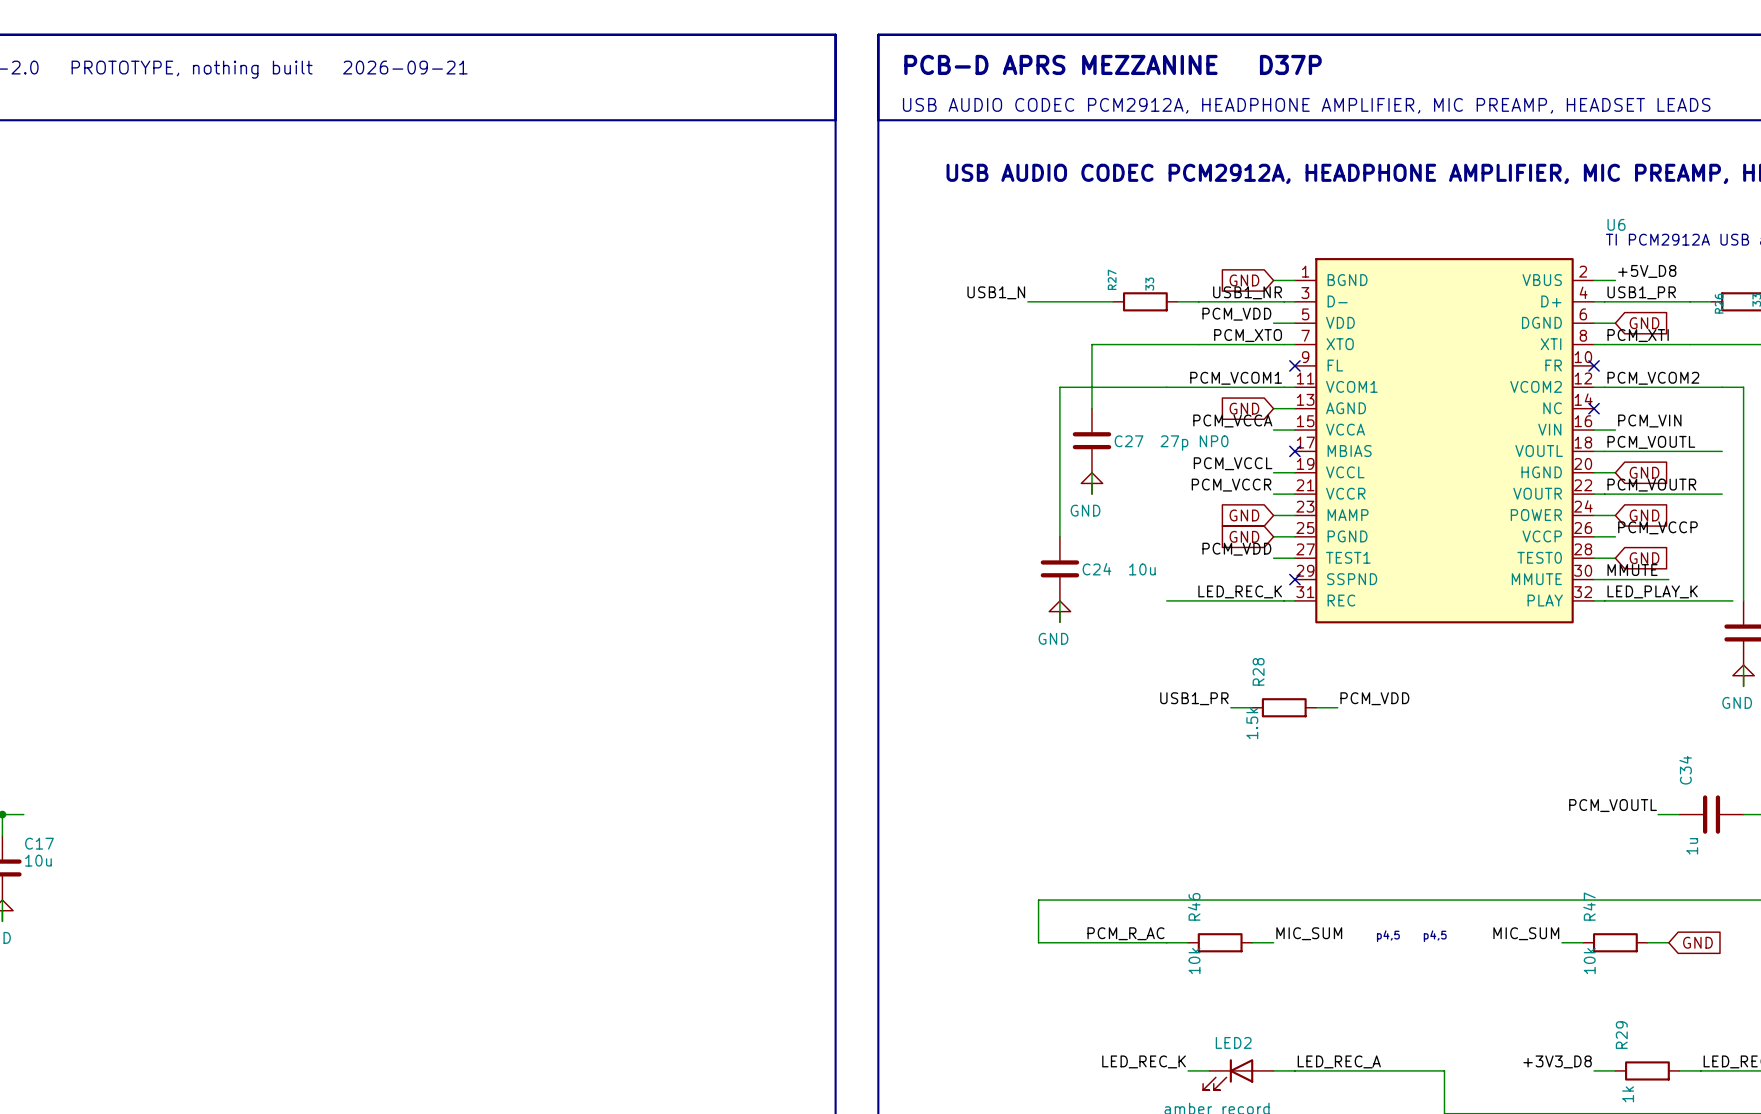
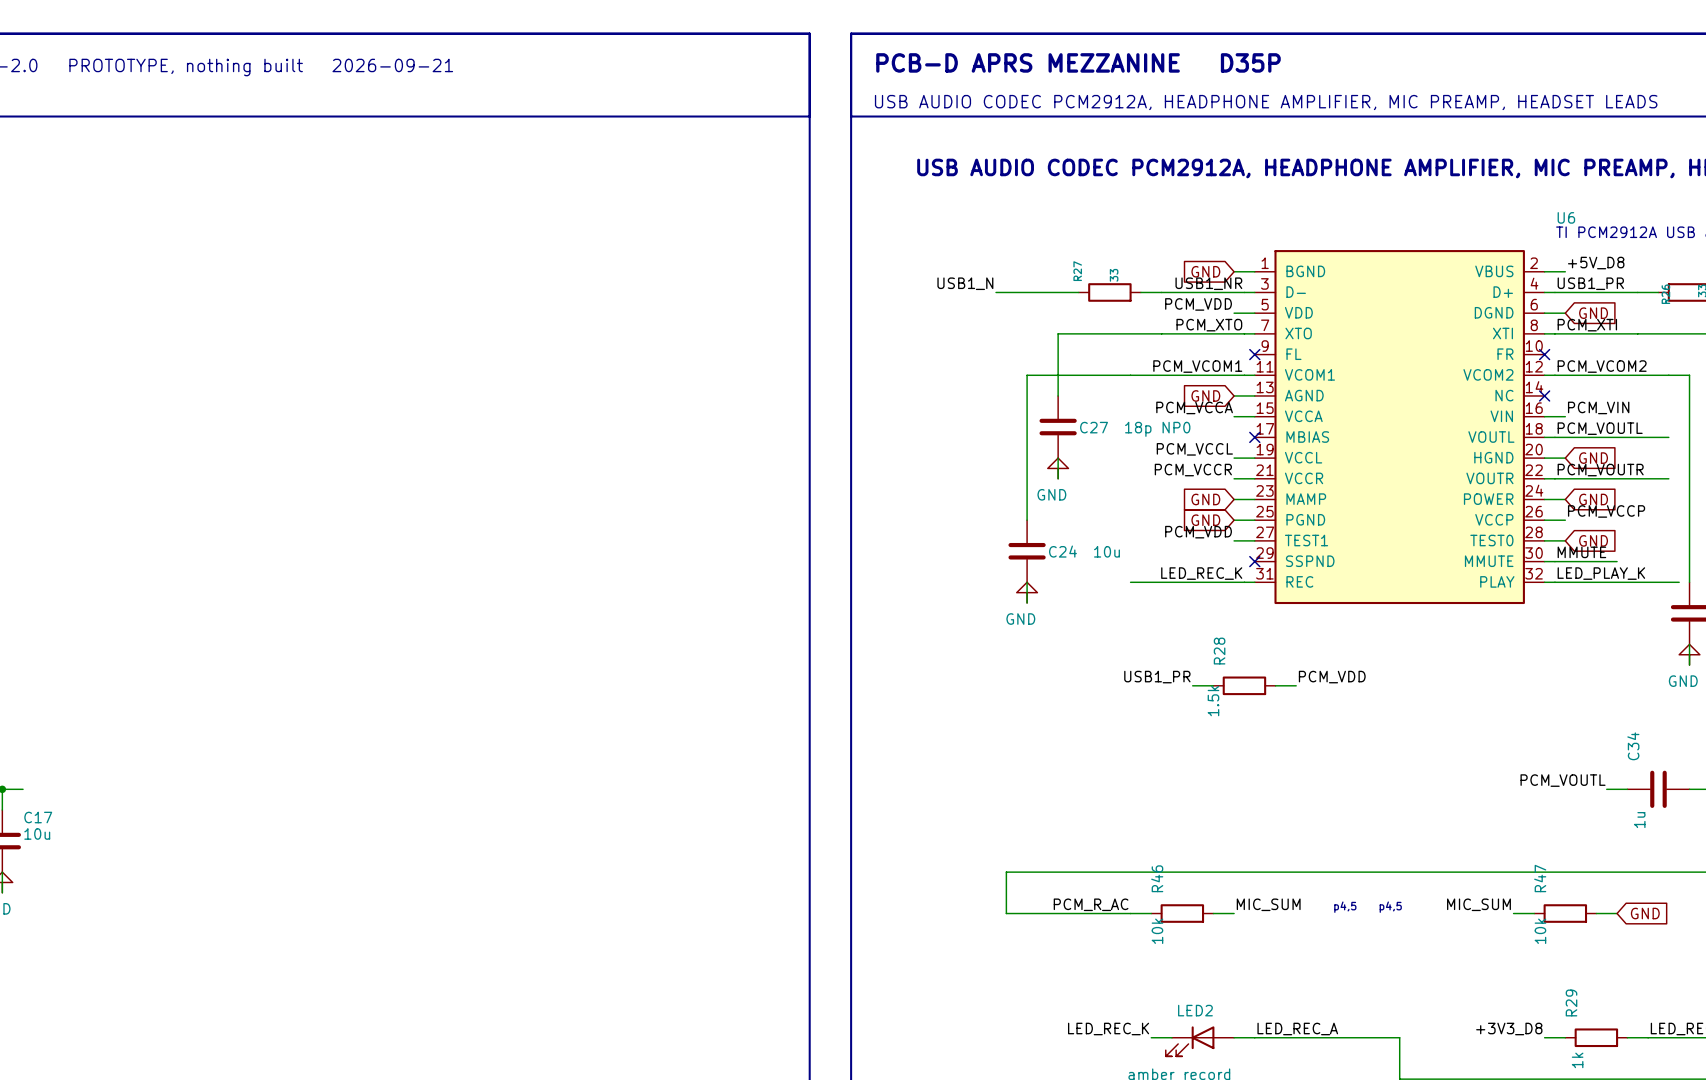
text: PCB-D APRS MEZZANINE D37P (1112, 64) -> PCB-D APRS MEZZANINE D35P (1078, 62)
C27 value: 27p NP0 (1194, 443) -> 18p NP0 (1157, 429)

